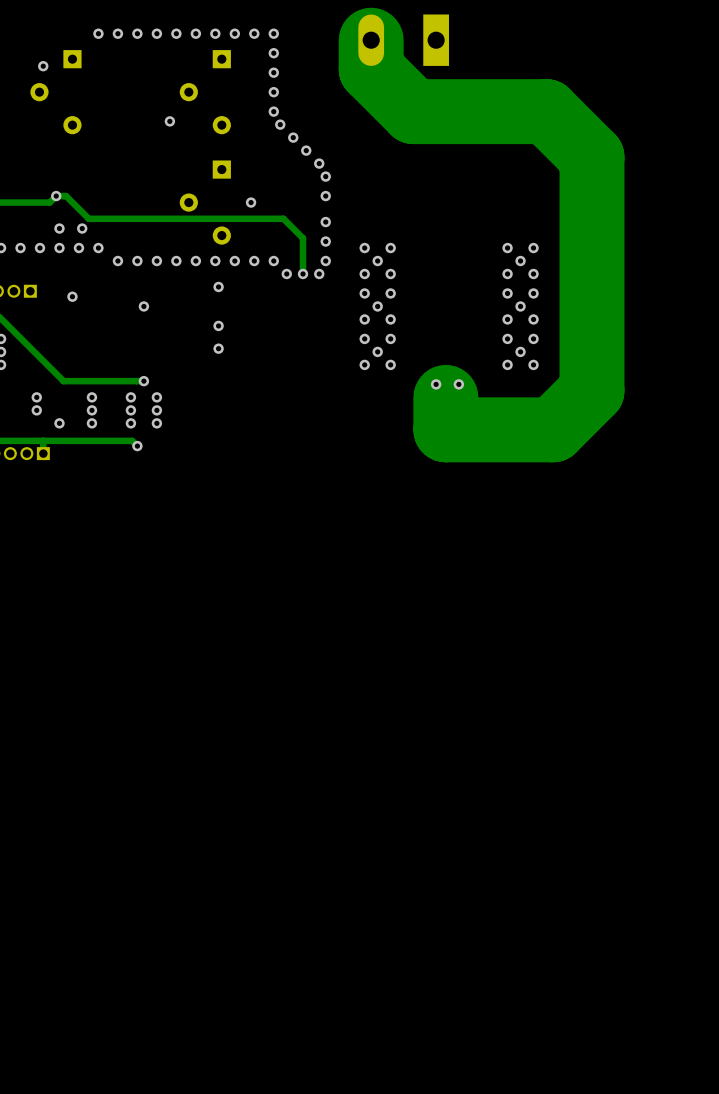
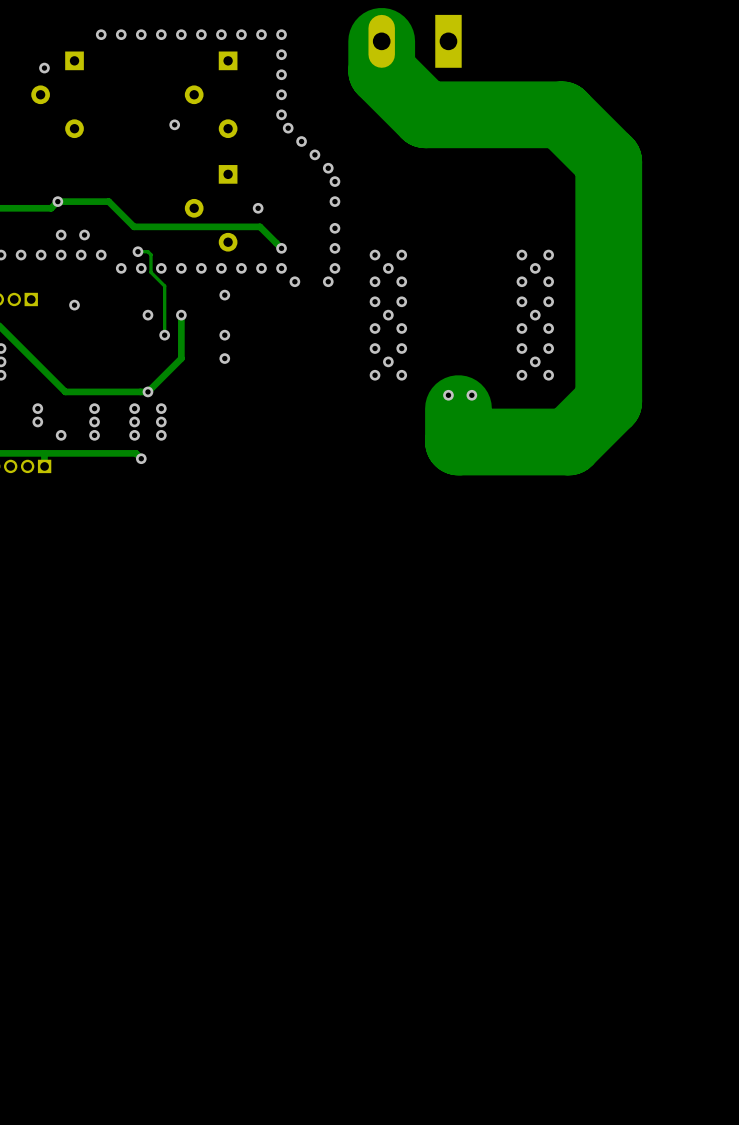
track: (66, 196) (88, 218) (283, 218) (303, 238) (303, 273) -> (67, 201) (108, 201) (133, 226) (260, 226) (281, 248)
track: none -> (137, 251) (147, 251) (150, 254) (150, 272) (164, 286) (164, 335)
via: none -> (137, 251)
via position: (303, 273) -> (281, 248)
track: none -> (181, 315) (181, 358) (147, 391)
via: none -> (181, 315)
via: none -> (164, 335)

